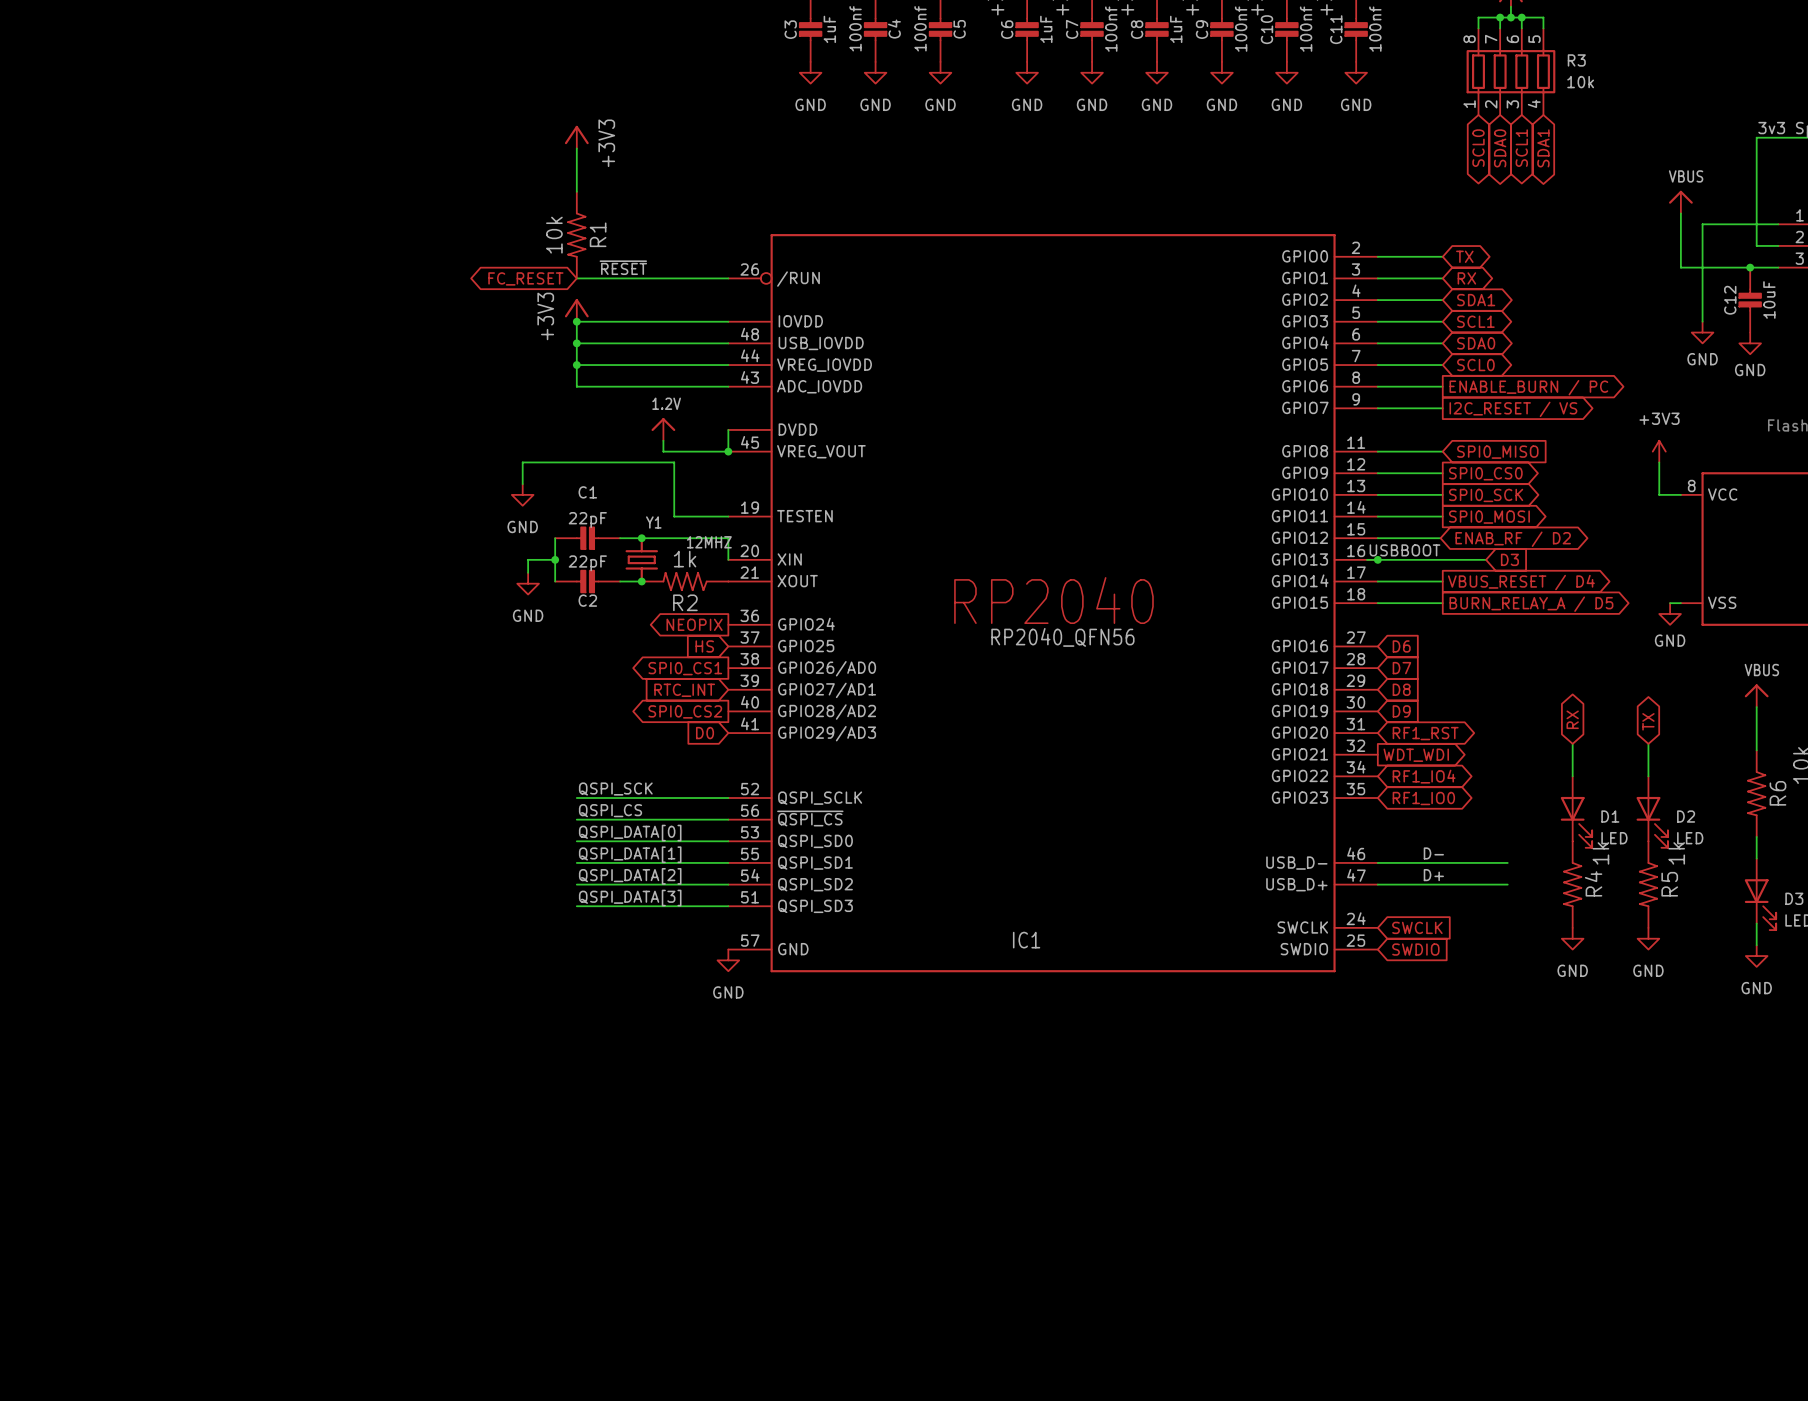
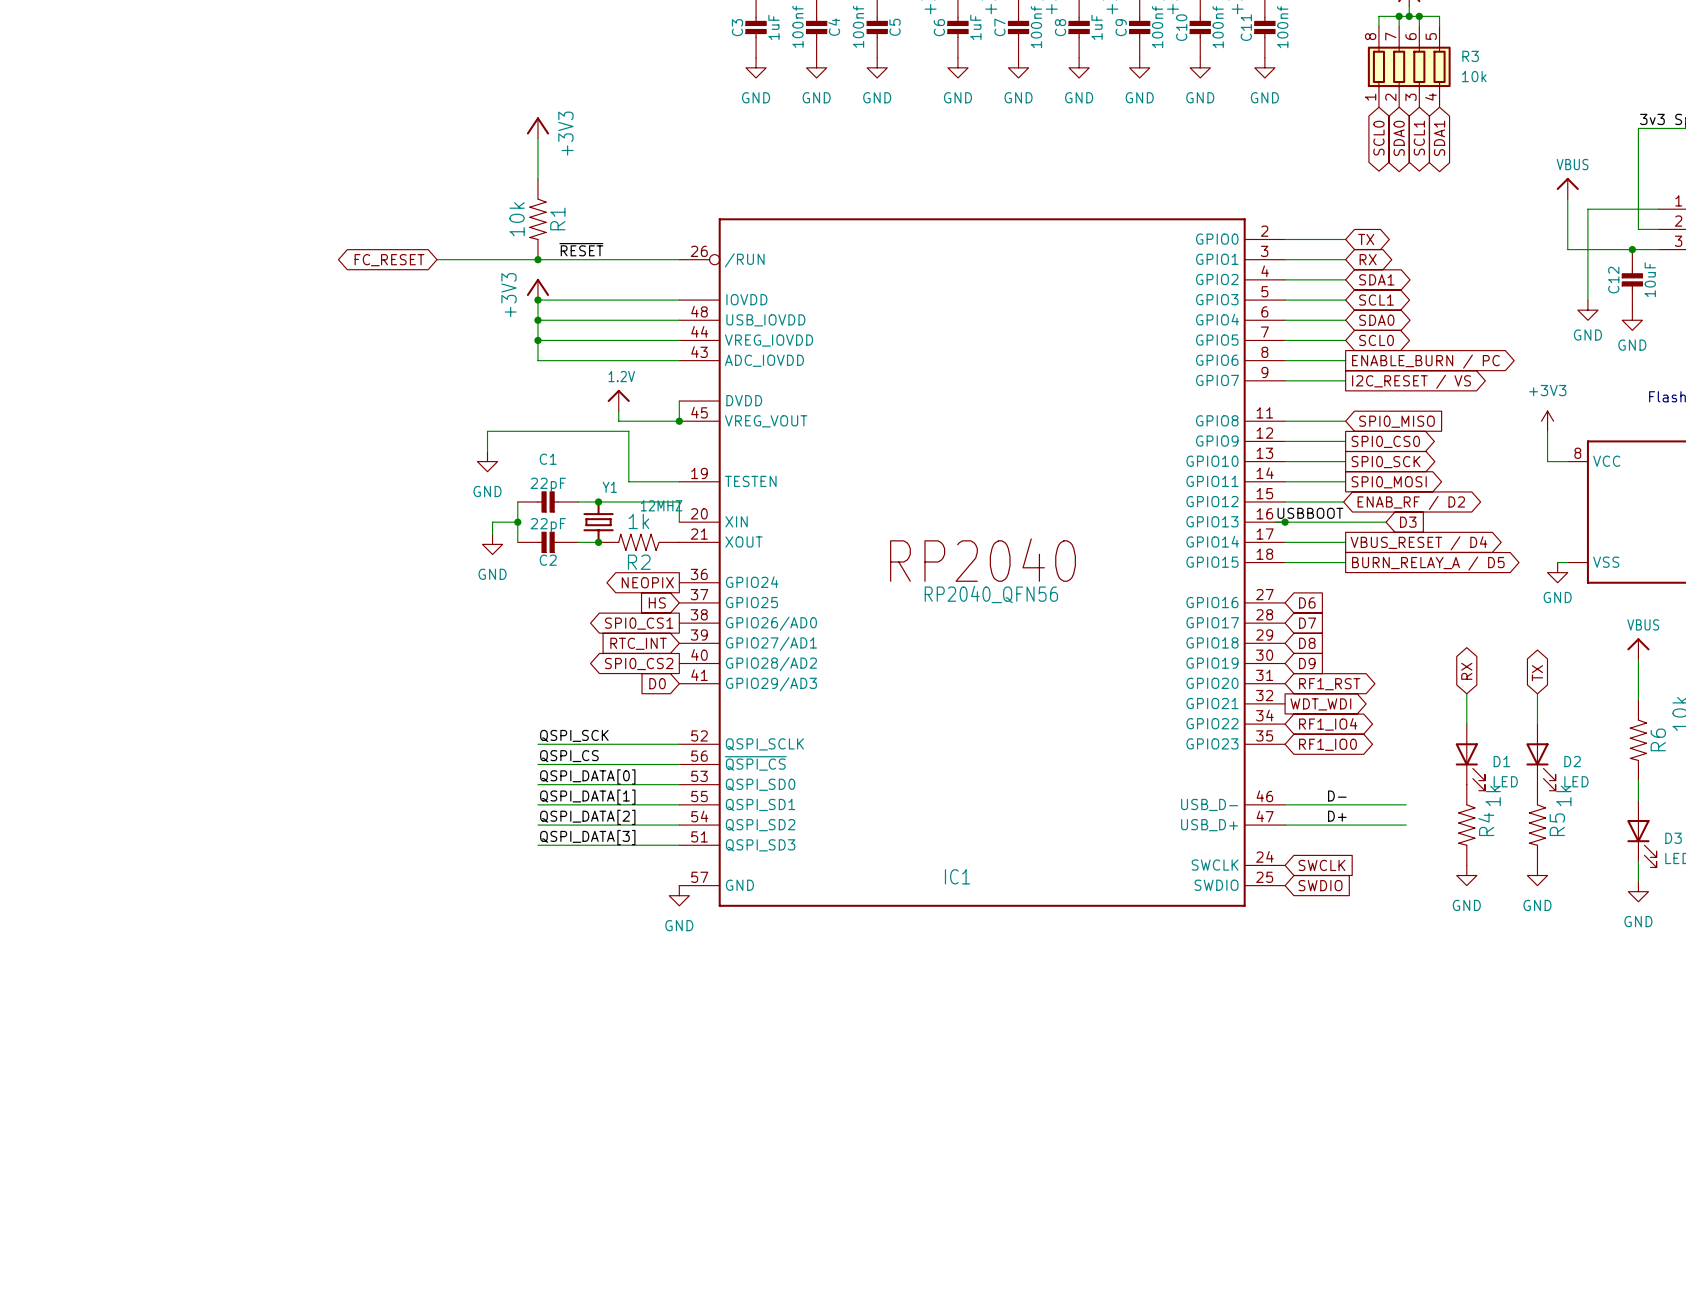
wire: none -> (437, 259) (537, 259)
global label position: FC_RESET (525, 278) -> FC_RESET (389, 260)
junction: none -> (537, 259)

